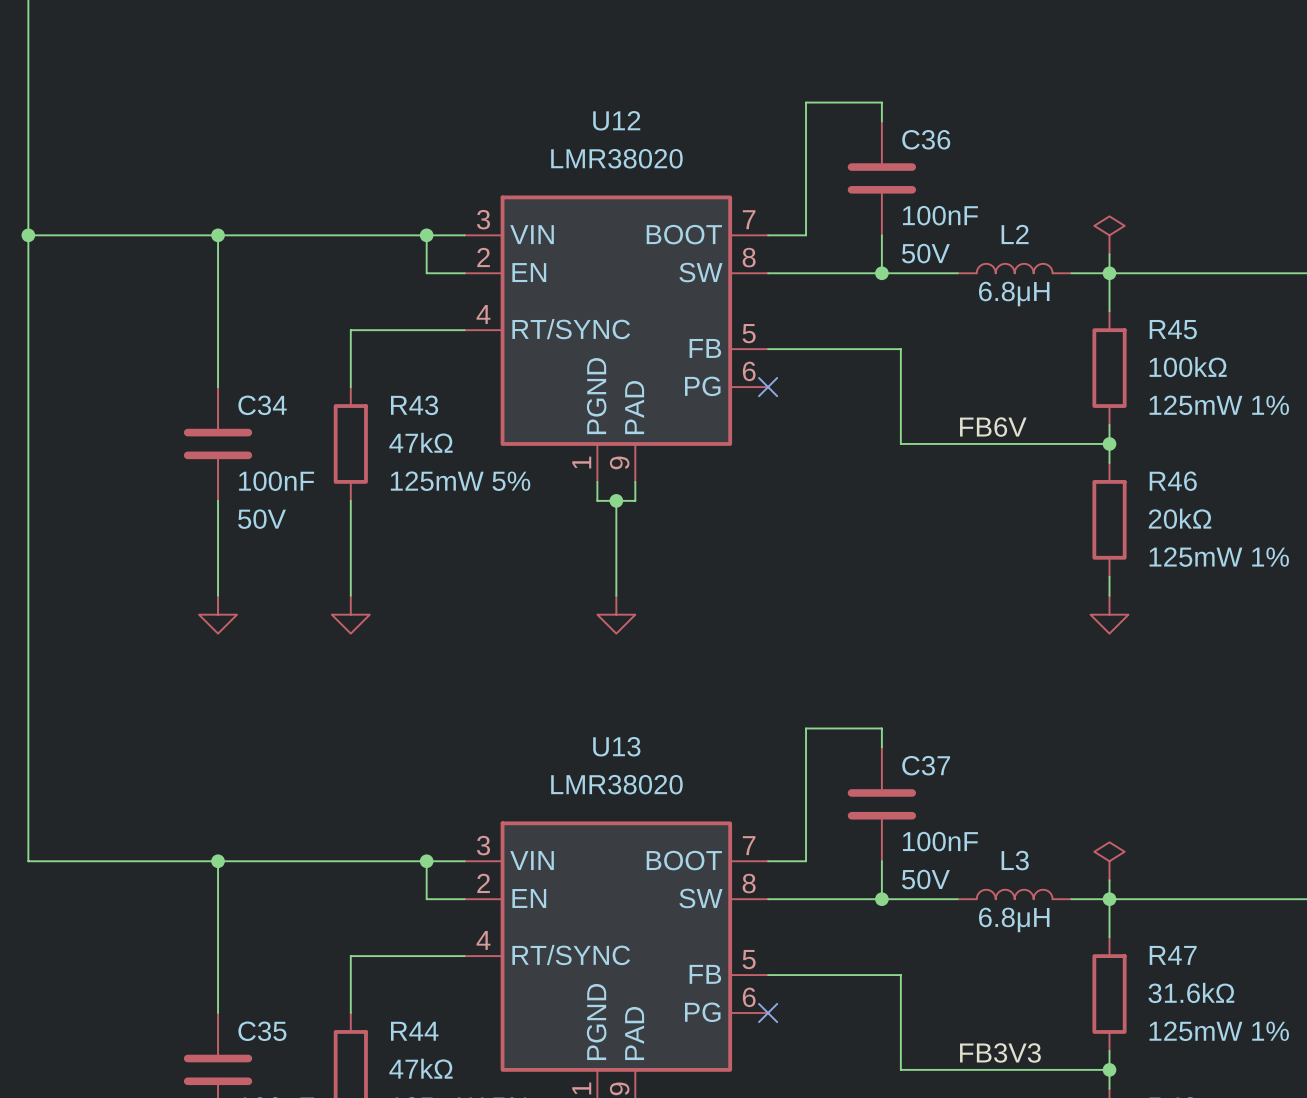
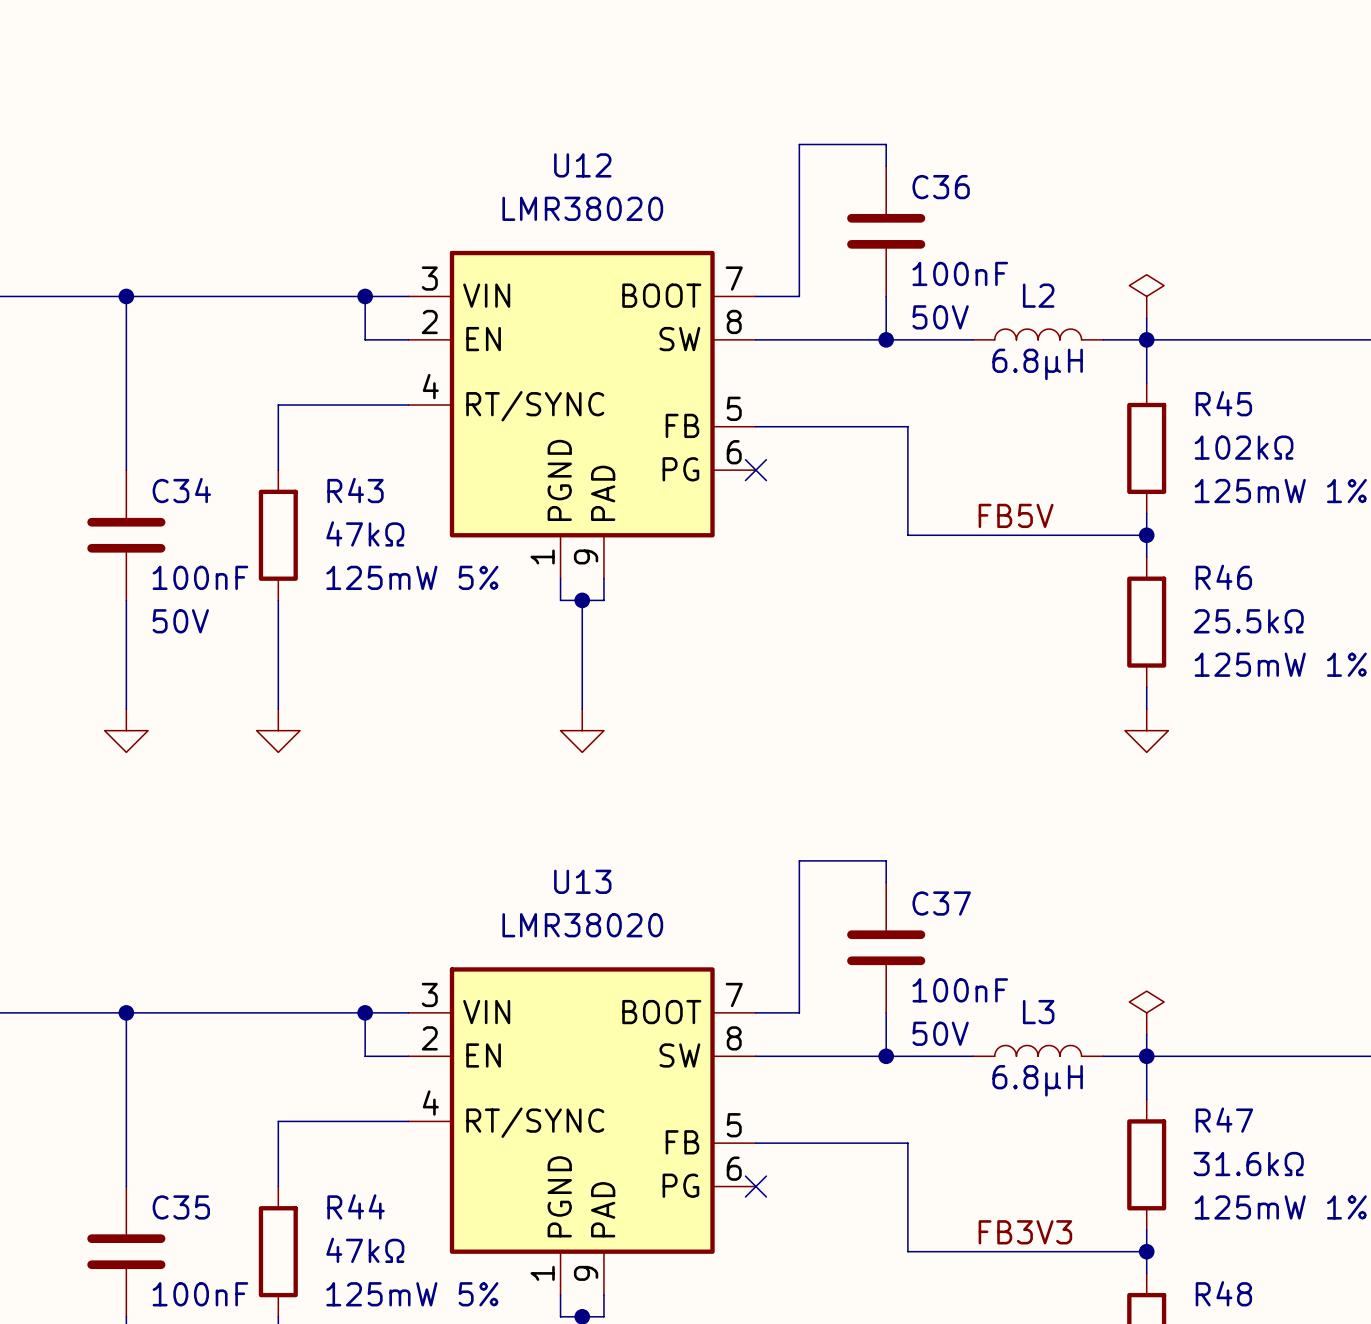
R45 value: 100kΩ (1188, 367) -> 102kΩ (1244, 447)
label: FB6V (993, 427) -> FB5V (1016, 515)
R46 value: 20kΩ (1180, 518) -> 25.5kΩ (1248, 621)

